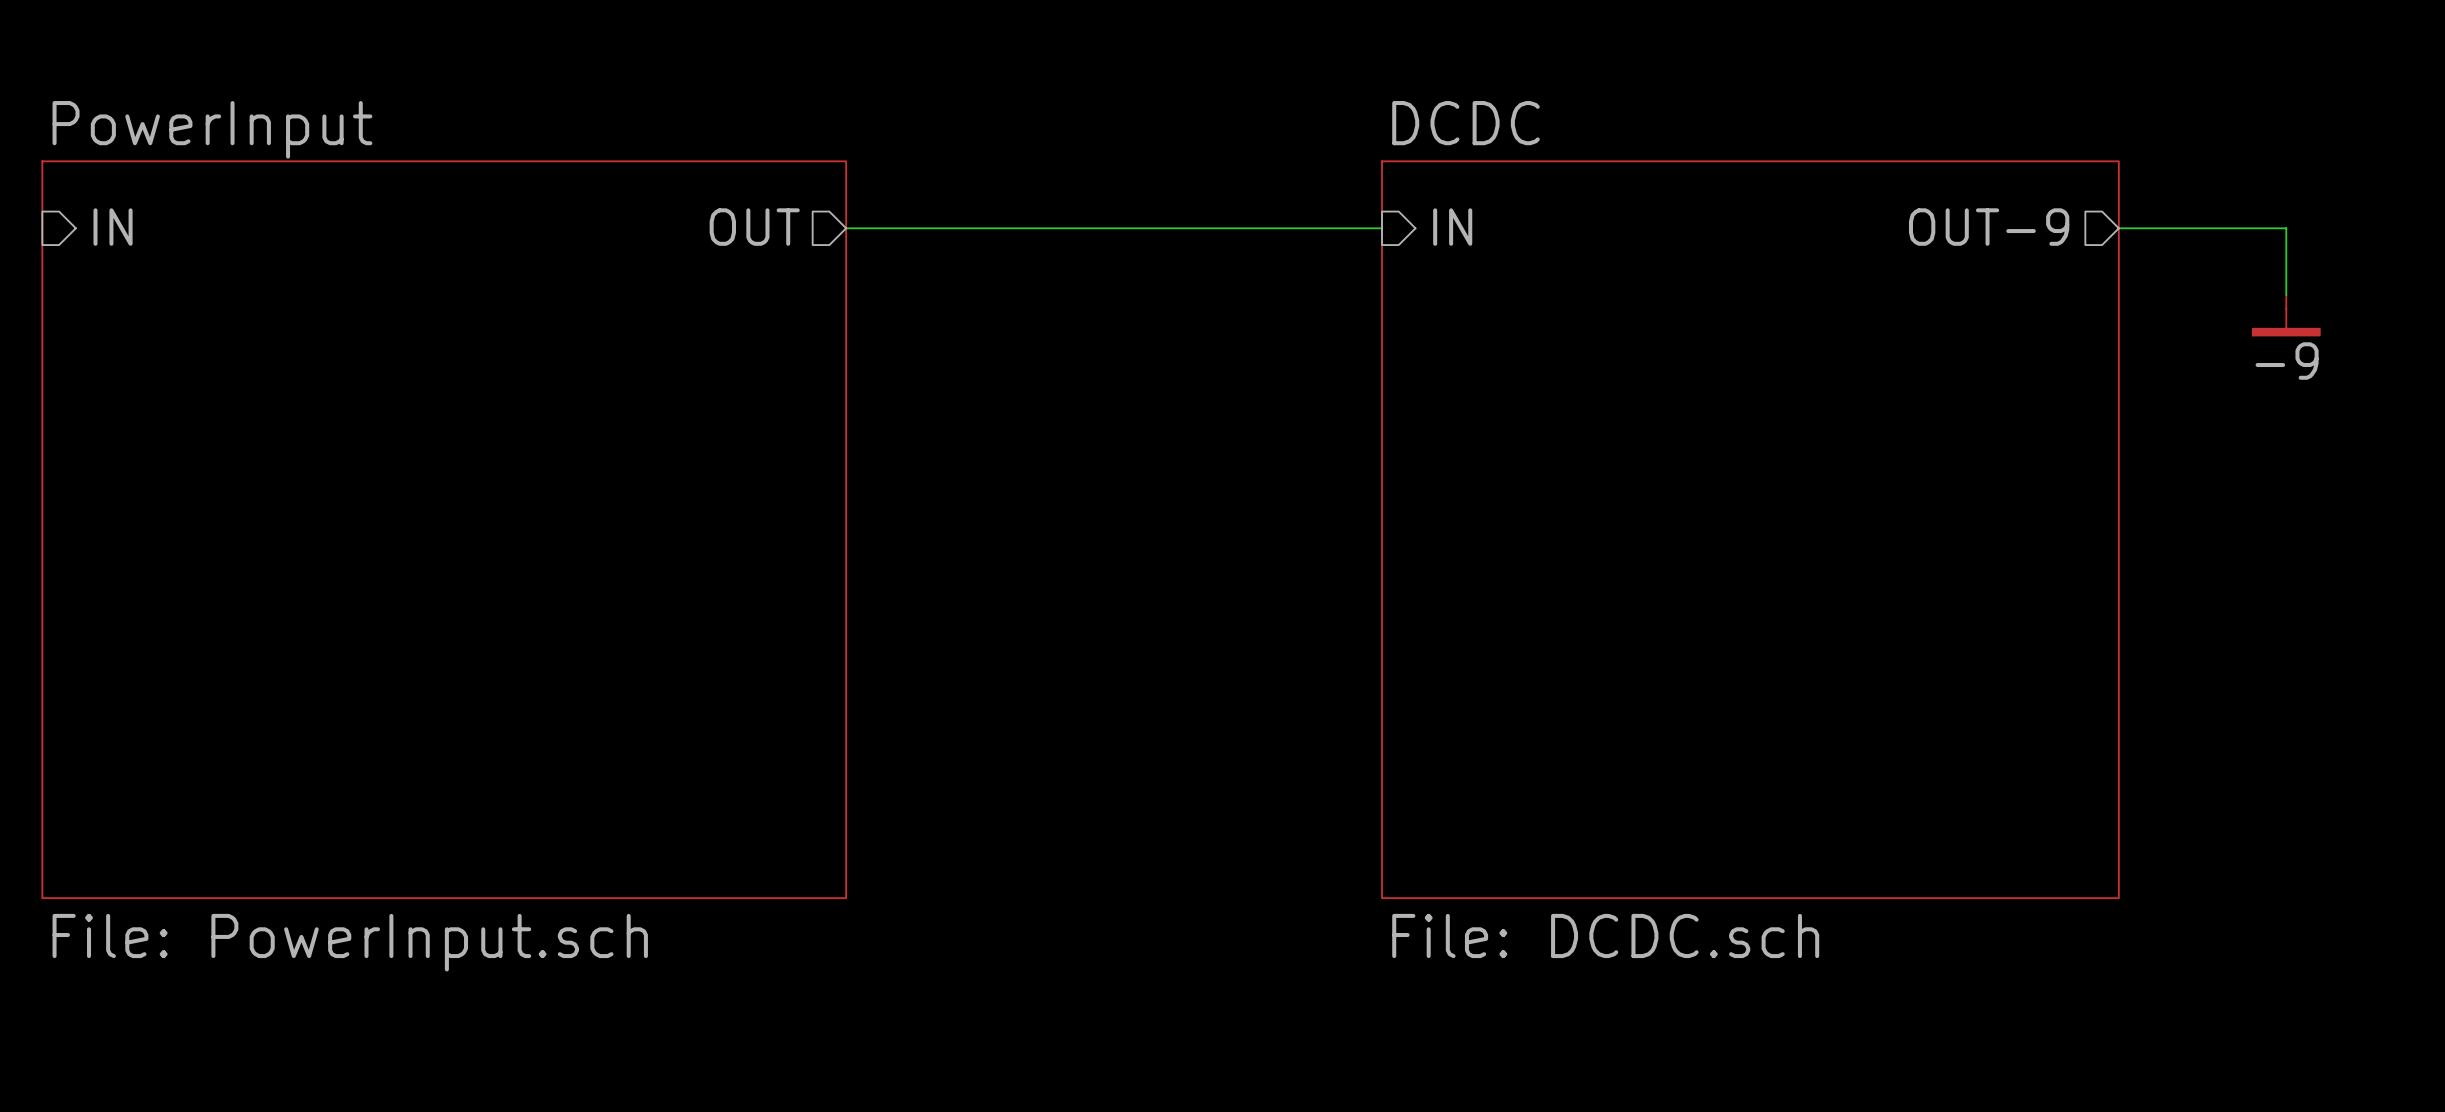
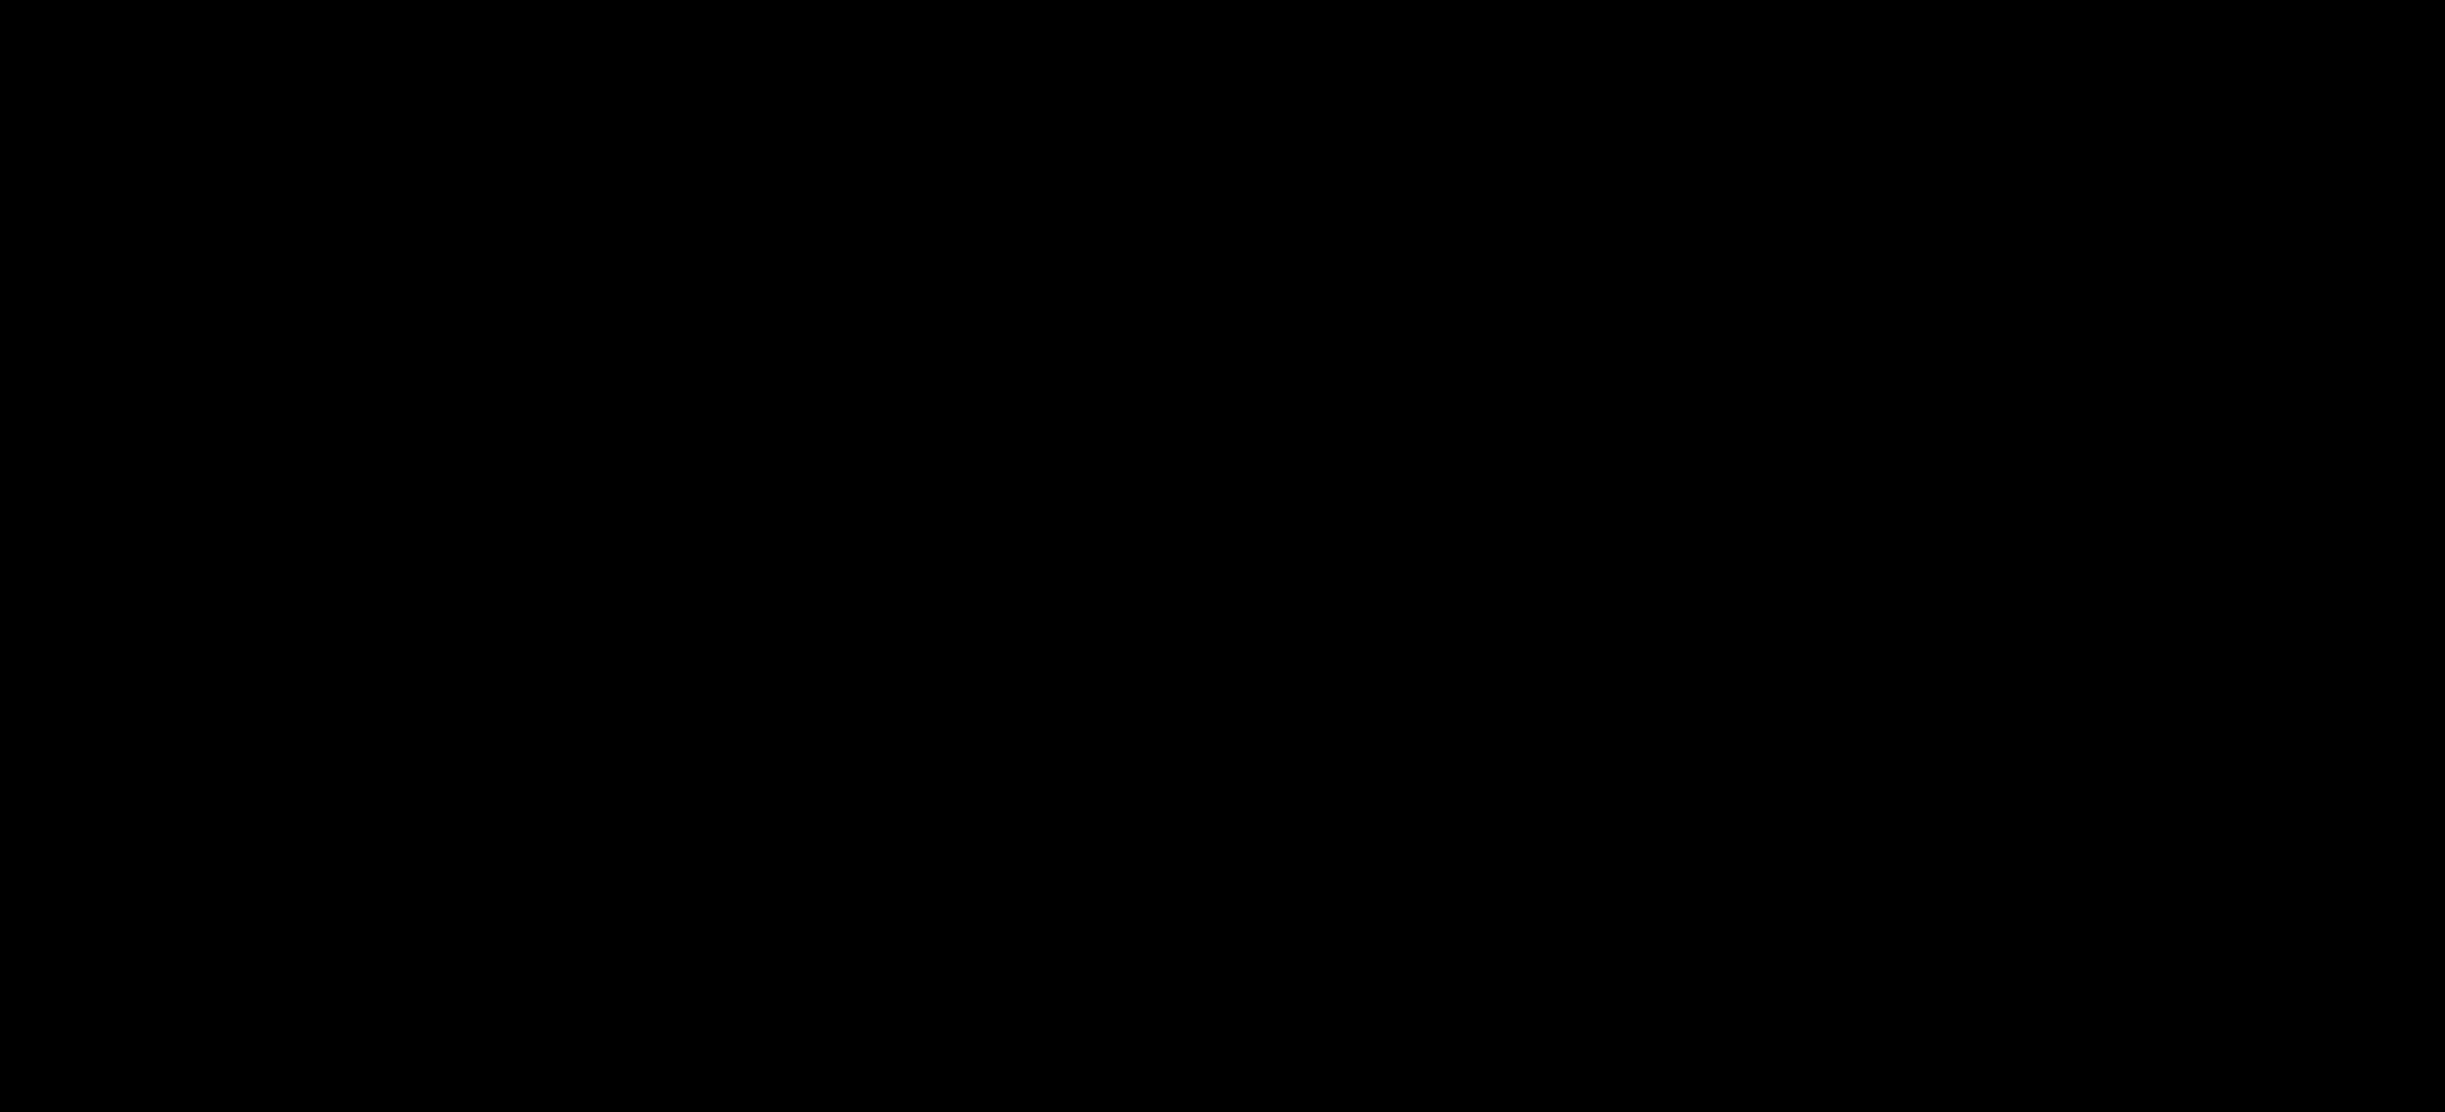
sheet pin: IN (113, 227) -> none
sheet pin: OUT (754, 227) -> none
sheet pin: IN (1452, 227) -> none
sheet pin: OUT-9 (1989, 227) -> none
wire: (846, 228) (1382, 228) -> none
wire: (2118, 228) (2286, 228) (2286, 295) -> none
power symbol: -9 (2286, 315) -> none
sheet PowerInput: File: PowerInput.sch (444, 529) -> none
sheet DCDC: File: DCDC.sch (1750, 529) -> none

